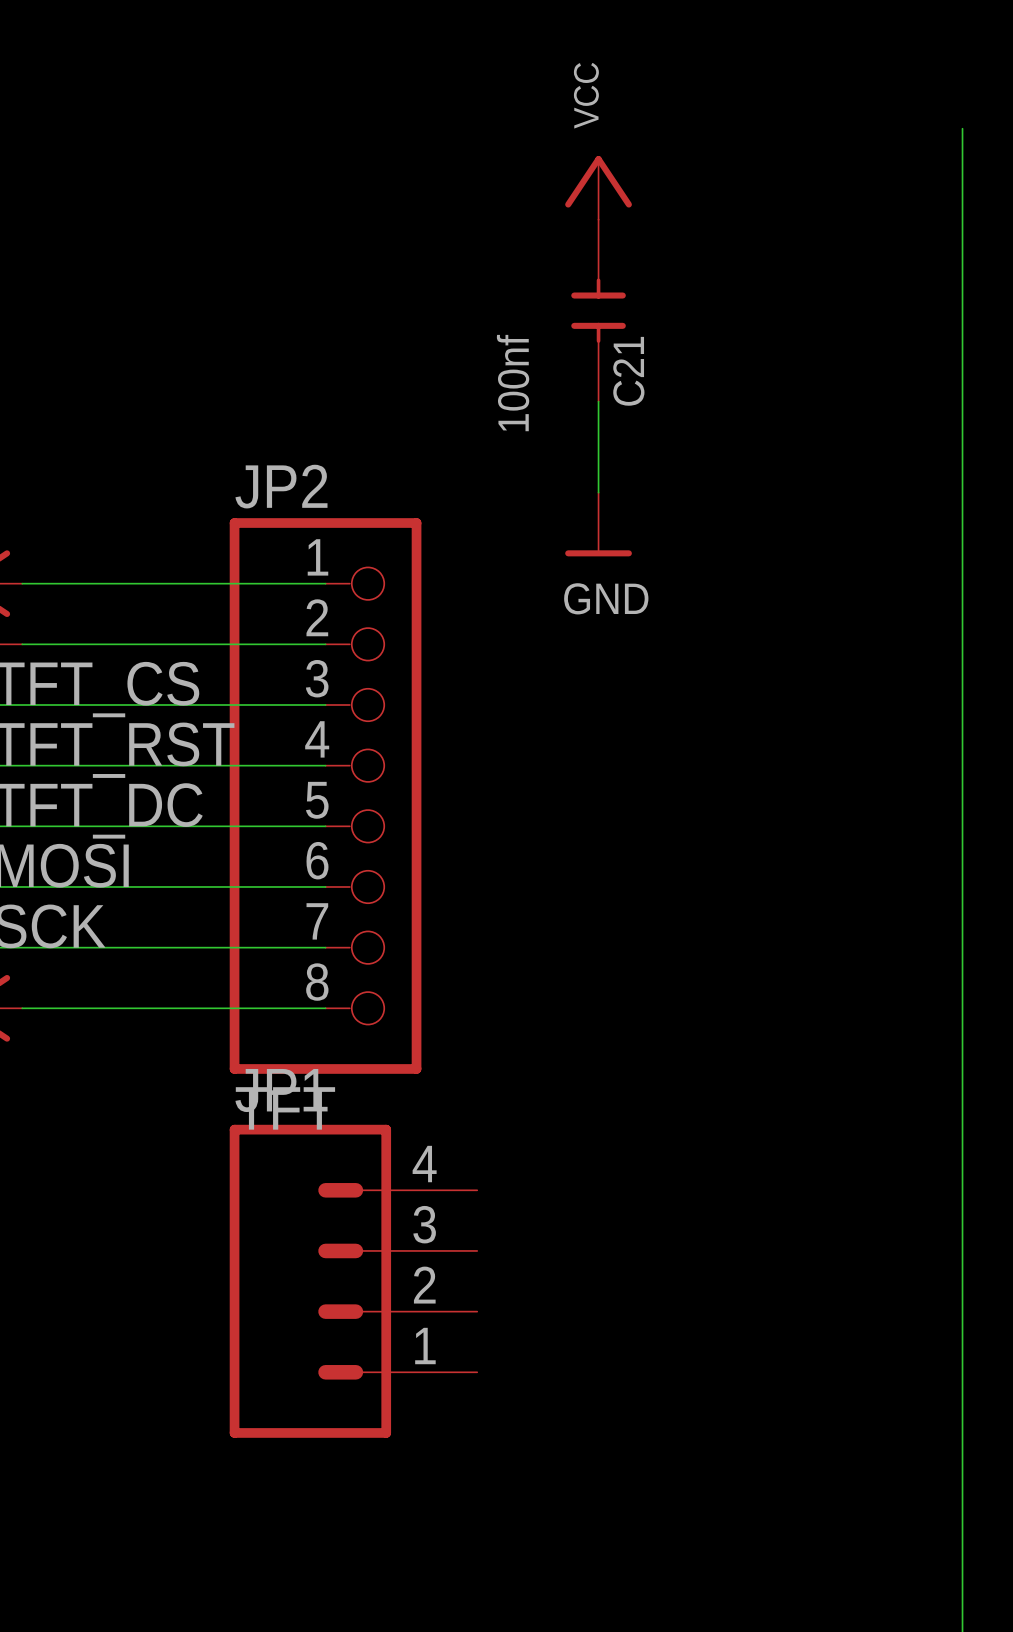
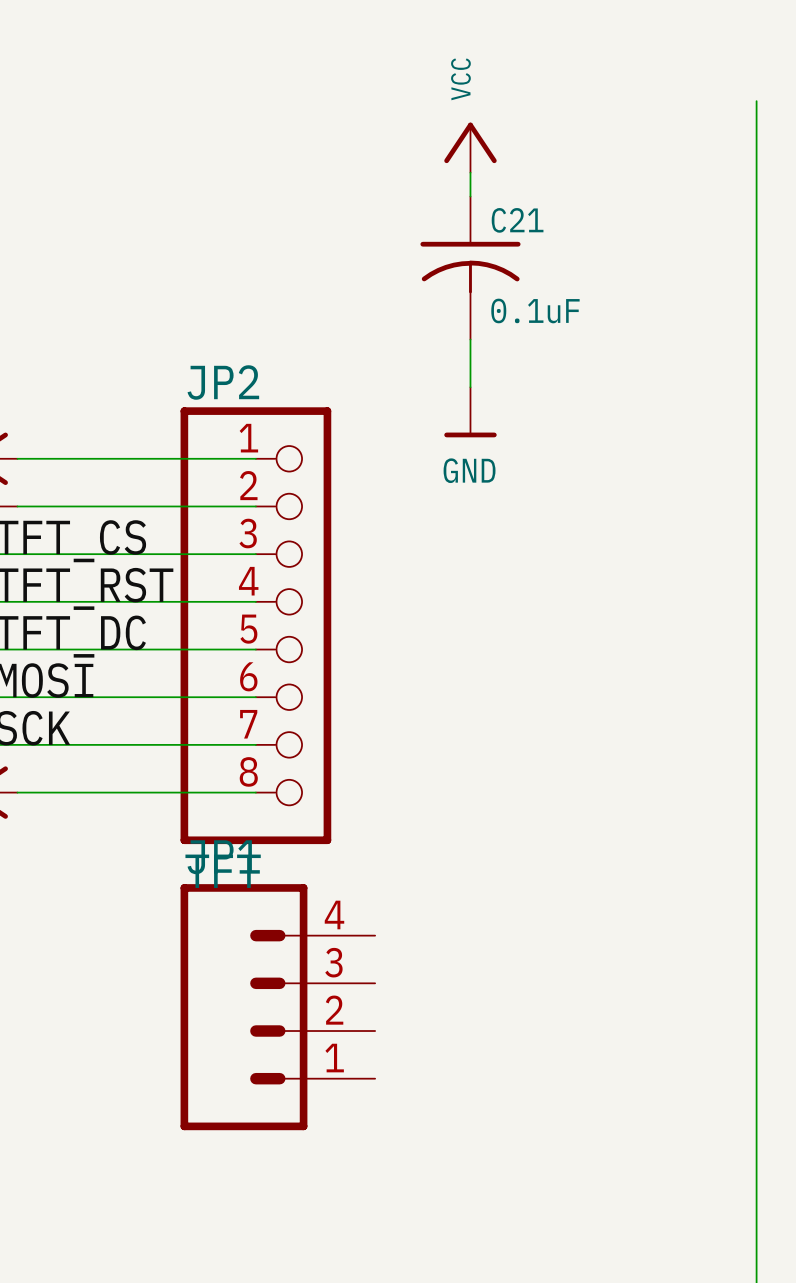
C21 symbol: [571, 219, 626, 402] -> [420, 196, 521, 340]
C21 name position: C21 (628, 371) -> C21 (517, 220)
C21 value: 100nf (513, 383) -> 0.1uF (535, 310)

